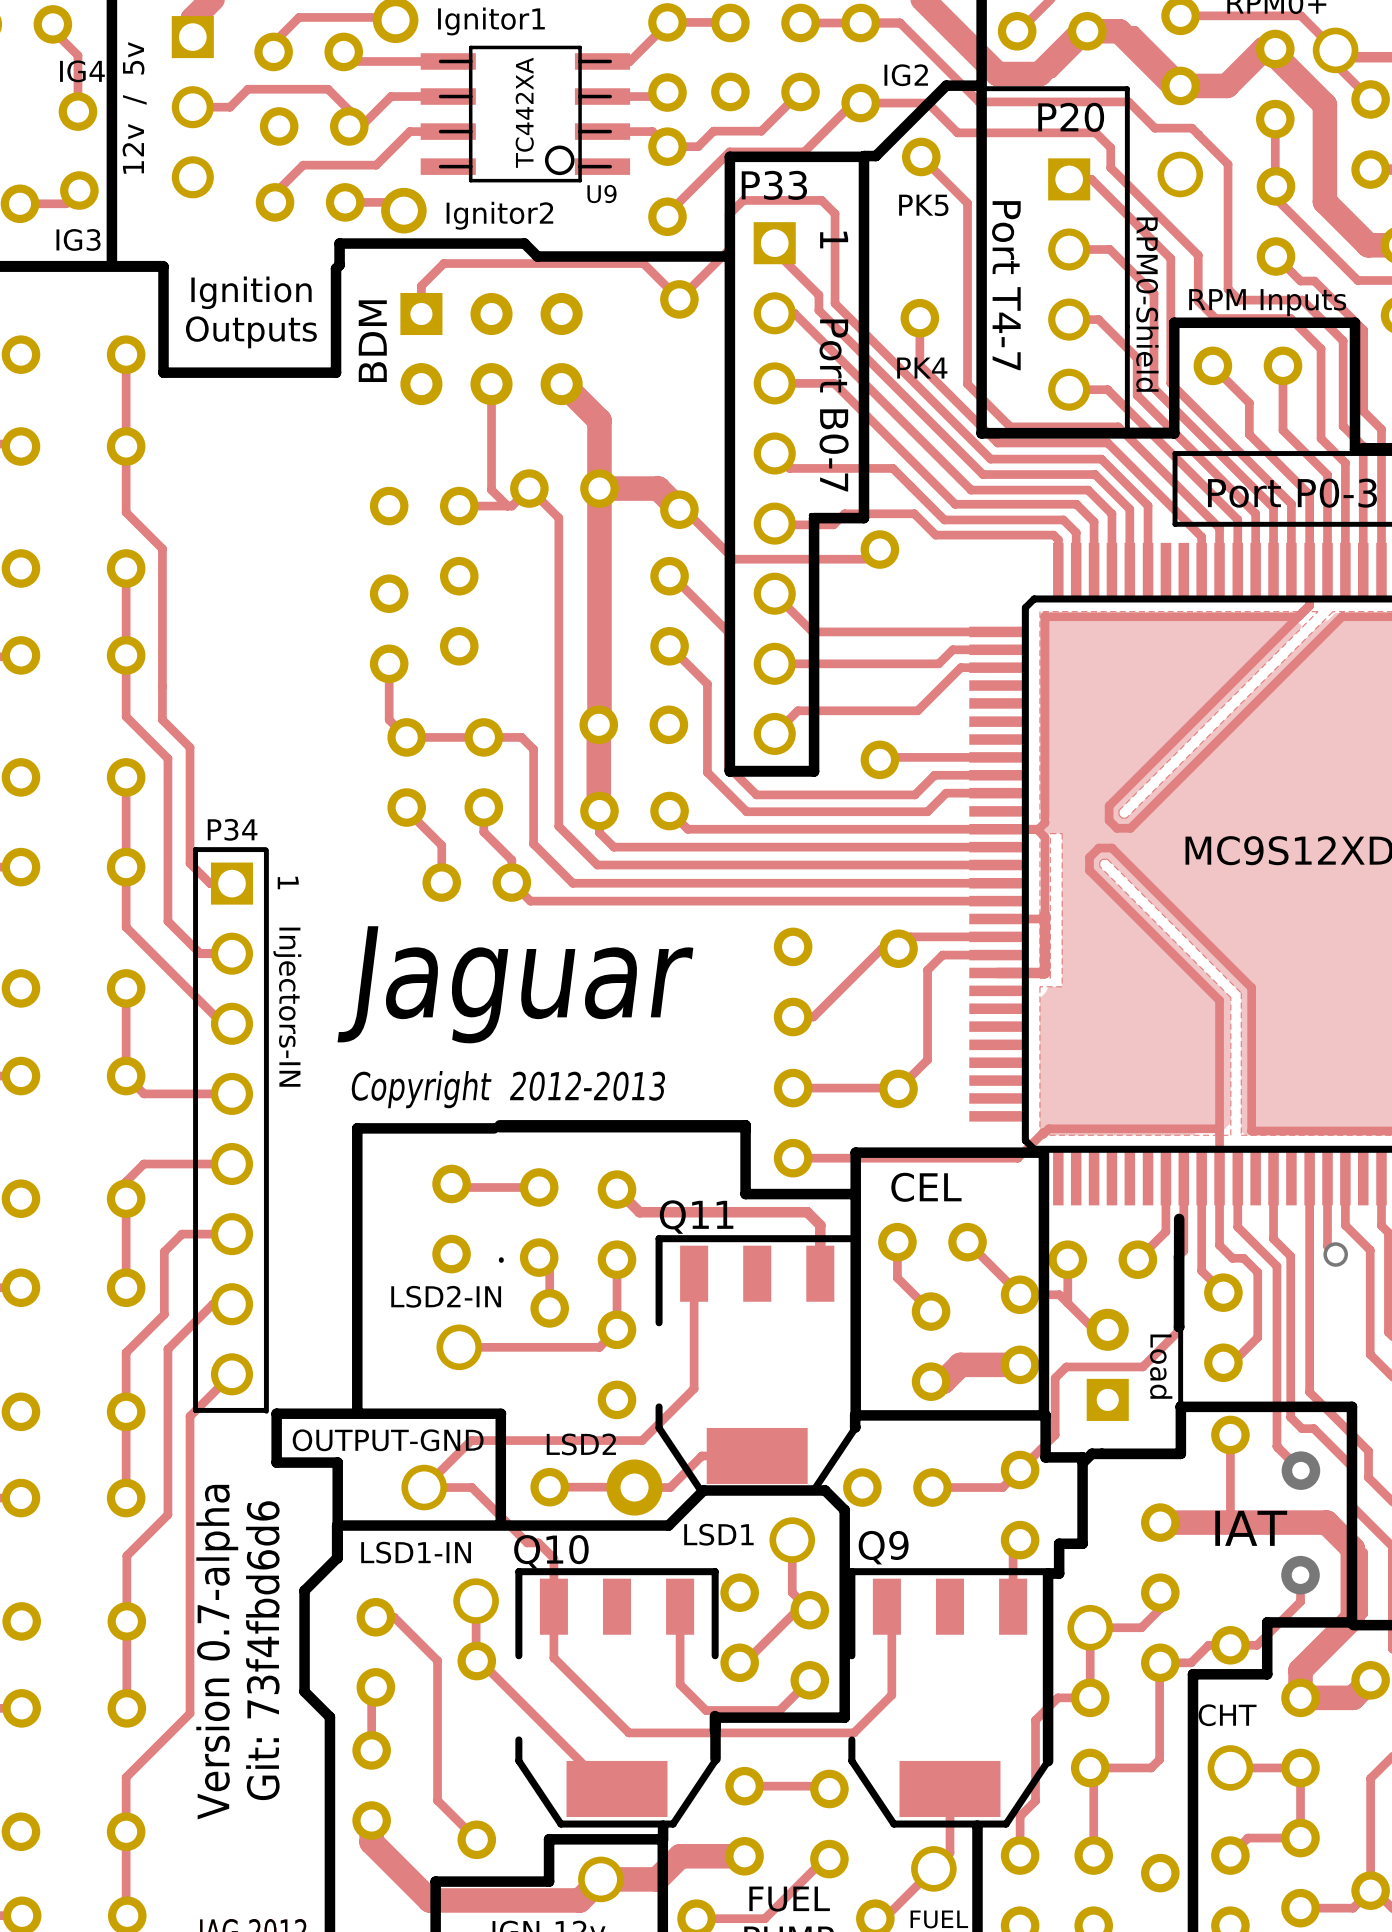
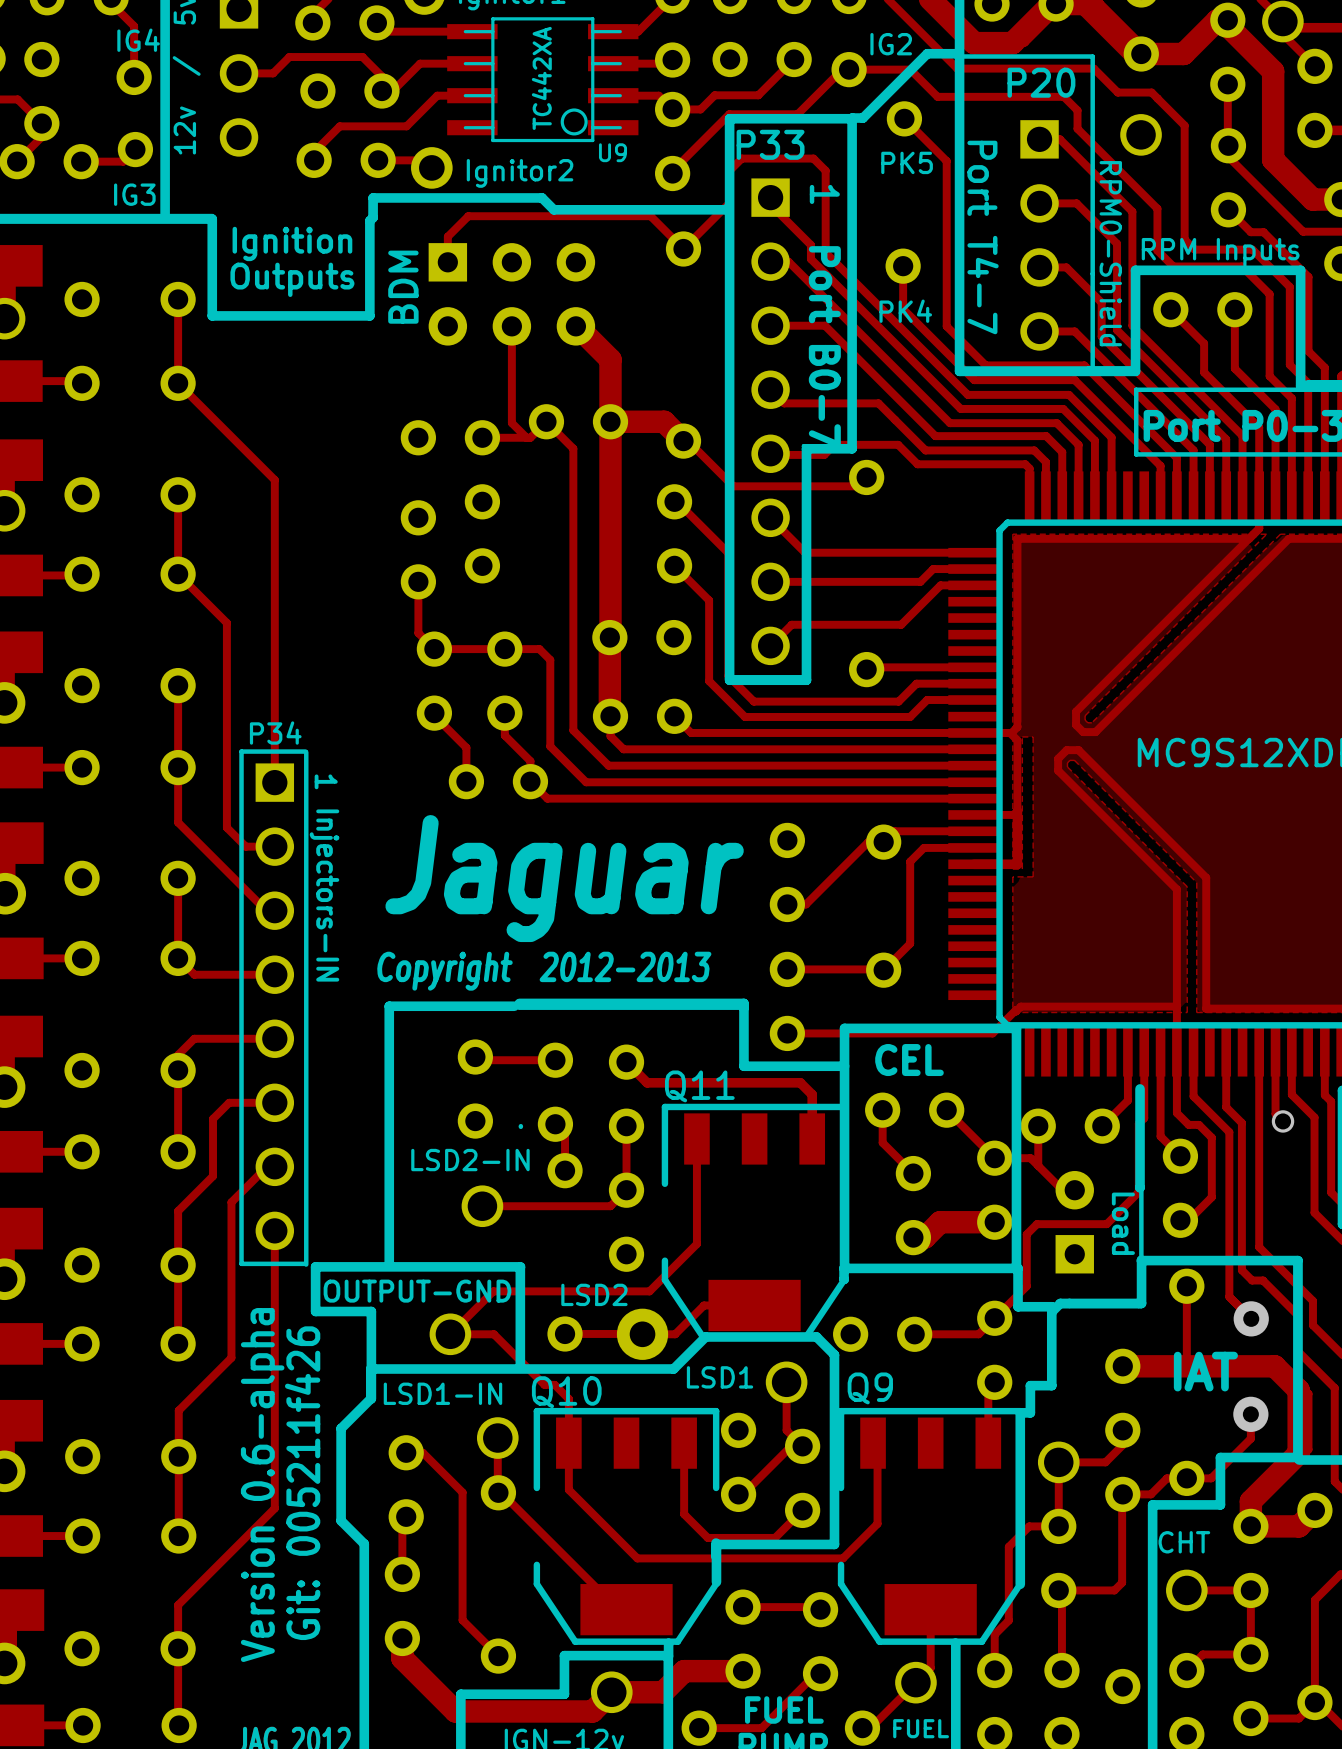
track: (126, 446) (126, 512) (162, 548) (162, 719) (190, 747) (190, 863) (210, 883) (231, 883) -> (178, 383) (274, 480) (274, 782)
track: (126, 655) (126, 716) (167, 758) (167, 921) (179, 932) -> (178, 574) (226, 622) (226, 827)
text position: Jaguar (515, 984) -> Jaguar (564, 878)
text position: Copyright 2012-2013 (508, 1089) -> Copyright 2012-2013 (544, 971)
track: (223, 1304) (212, 1304) (167, 1349) (167, 1514) (126, 1555) (126, 1571) -> (266, 1166) (231, 1202) (231, 1357) (178, 1410)
track: (231, 1374) (190, 1416) (190, 1713) (126, 1777) (126, 1784) -> (274, 1230) (274, 1508) (178, 1605)
text: Git: 73f4fbd6d6 (262, 1650) -> Git: 005211f426 (302, 1483)
text: Version 0.7-alpha (217, 1652) -> Version 0.6-alpha (262, 1485)

